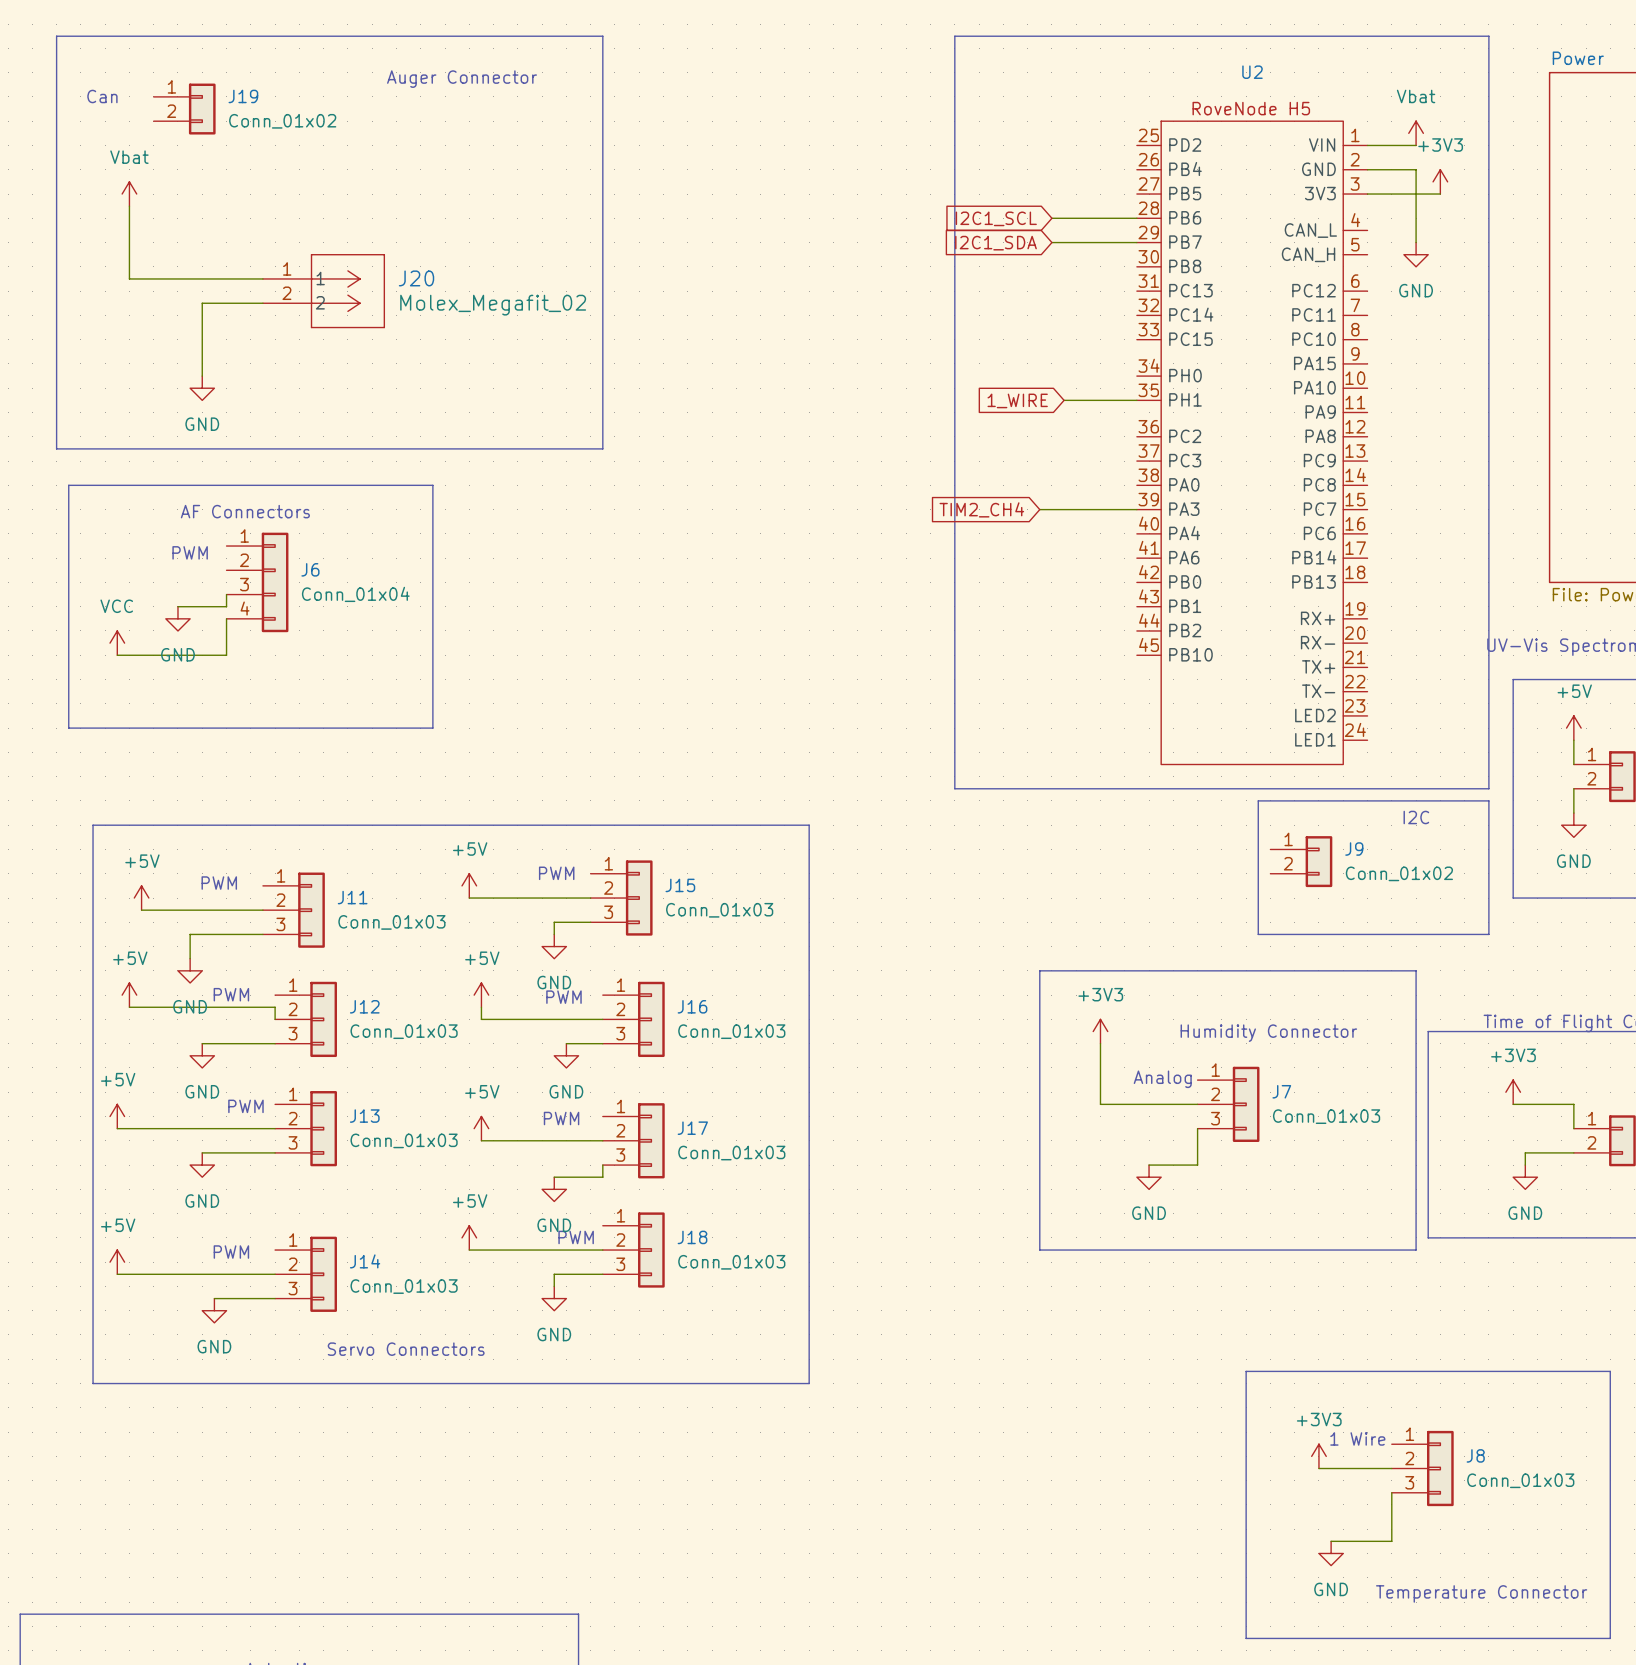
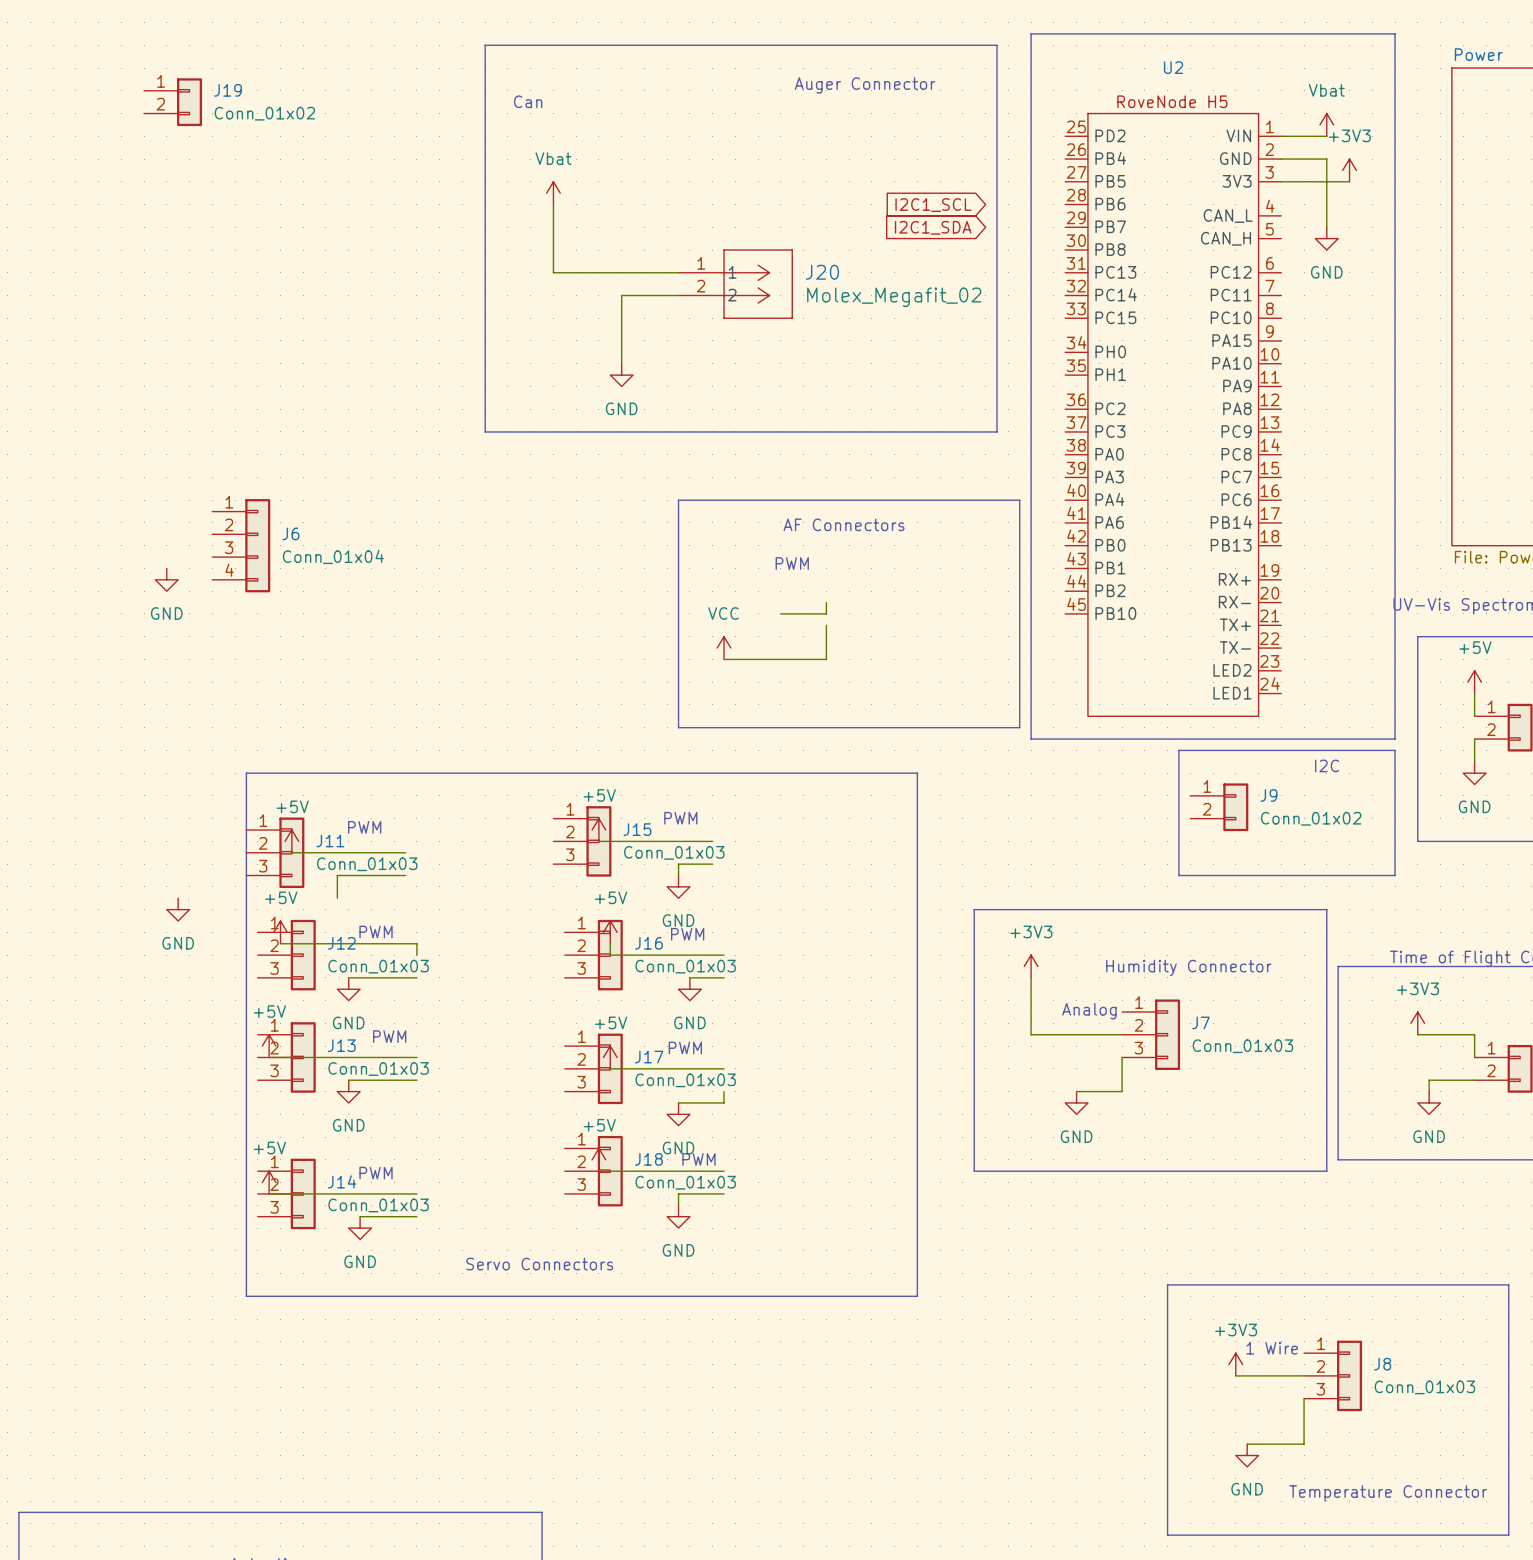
line: (56, 36) (602, 36) (602, 448) (56, 448) (56, 36) -> none
line: (1100, 36) (954, 36) (954, 788) (1100, 788) -> (1031, 33) (1031, 739)
line: none -> (485, 45) (996, 45) (996, 431) (485, 431) (485, 45)
text: Auger Connector (462, 79) -> none
text: none -> Auger Connector (865, 85)
text: Can (102, 96) -> none
text: none -> Can (528, 101)
power symbol: Vbat (129, 194) -> none
wire: (129, 206) (129, 278) (262, 278) -> none
power symbol: none -> Vbat (553, 193)
wire: none -> (553, 204) (553, 272) (678, 272)
wire: (1051, 218) (1136, 218) -> none
wire: (1051, 242) (1136, 242) -> none
J20 position: (323, 291) -> (735, 284)
wire: (262, 303) (202, 303) (202, 376) -> none
wire: none -> (678, 295) (621, 295) (621, 363)
power symbol: GND (202, 388) -> none
power symbol: none -> GND (621, 375)
global label: 1_WIRE (1017, 400) -> none
wire: (1064, 400) (1136, 400) -> none
line: (68, 485) (432, 485) (432, 728) (68, 728) (68, 485) -> none
global label: TIM2_CH4 (981, 509) -> none
wire: (1039, 509) (1136, 509) -> none
text: AF Connectors (245, 511) -> none
line: none -> (678, 500) (1019, 500) (1019, 727) (678, 727) (678, 500)
text: PWM (190, 552) -> none
text: none -> AF Connectors (844, 524)
wire: (226, 594) (226, 606) (177, 606) -> none
text: none -> PWM (792, 563)
wire: (226, 618) (226, 655) (117, 655) -> none
power symbol: VCC (117, 643) -> none
wire: none -> (826, 602) (826, 613) (780, 613)
wire: none -> (826, 625) (826, 659) (724, 659)
power symbol: none -> VCC (724, 648)
line: (262, 825) (93, 825) (93, 1383) (262, 1383) -> (246, 773) (246, 1296)
line: (809, 825) (809, 1383) -> (758, 773) (917, 773) (917, 1296) (758, 1296)
text: PWM (556, 873) -> none
text: none -> PWM (680, 818)
text: PWM (219, 883) -> none
text: none -> PWM (364, 827)
power symbol: +5V (469, 885) -> none
power symbol: none -> +5V (598, 830)
power symbol: +5V (141, 898) -> none
power symbol: none -> +5V (291, 841)
wire: (469, 898) (590, 898) -> (598, 841) (712, 841)
wire: (141, 910) (262, 910) -> (291, 852) (405, 852)
wire: (590, 922) (554, 922) (554, 934) -> (712, 864) (678, 864) (678, 875)
wire: (262, 934) (190, 934) (190, 958) -> (405, 875) (337, 875) (337, 898)
power symbol: GND (554, 946) -> none
power symbol: none -> GND (678, 886)
text: PWM (231, 994) -> none
text: none -> PWM (376, 931)
power symbol: +5V (129, 995) -> none
power symbol: none -> +5V (280, 932)
power symbol: +5V (481, 995) -> none
power symbol: none -> +5V (610, 932)
text: PWM (563, 997) -> none
text: none -> PWM (687, 934)
wire: (129, 1007) (275, 1007) (275, 1019) -> (280, 943) (416, 943) (416, 955)
wire: (481, 1007) (481, 1019) (602, 1019) -> (610, 943) (610, 955) (724, 955)
wire: (202, 1043) (275, 1043) -> (348, 977) (416, 977)
wire: (566, 1043) (602, 1043) -> (689, 977) (724, 977)
power symbol: GND (202, 1055) -> none
power symbol: none -> GND (348, 989)
power symbol: GND (566, 1055) -> none
power symbol: none -> GND (689, 989)
text: PWM (245, 1106) -> none
text: none -> PWM (389, 1036)
power symbol: +5V (117, 1116) -> none
power symbol: none -> +5V (269, 1046)
text: PWM (561, 1118) -> none
text: none -> PWM (685, 1047)
wire: (117, 1128) (275, 1128) -> (269, 1057) (416, 1057)
power symbol: +5V (481, 1128) -> none
power symbol: none -> +5V (610, 1057)
wire: (481, 1140) (602, 1140) -> (610, 1068) (724, 1068)
wire: (202, 1152) (275, 1152) -> (348, 1080) (416, 1080)
power symbol: GND (202, 1165) -> none
power symbol: none -> GND (348, 1091)
wire: (602, 1165) (602, 1177) (554, 1177) -> (724, 1091) (724, 1102) (678, 1102)
power symbol: GND (554, 1189) -> none
power symbol: none -> GND (678, 1114)
power symbol: +5V (469, 1237) -> none
text: PWM (576, 1237) -> none
power symbol: none -> +5V (598, 1159)
text: none -> PWM (699, 1159)
wire: (469, 1250) (602, 1250) -> (598, 1171) (724, 1171)
text: PWM (231, 1252) -> none
text: none -> PWM (376, 1173)
power symbol: +5V (117, 1262) -> none
power symbol: none -> +5V (269, 1182)
wire: (117, 1274) (275, 1274) -> (269, 1193) (416, 1193)
wire: (602, 1274) (554, 1274) (554, 1286) -> (724, 1193) (678, 1193) (678, 1205)
wire: (214, 1298) (275, 1298) -> (360, 1216) (416, 1216)
power symbol: GND (554, 1298) -> none
power symbol: none -> GND (678, 1216)
power symbol: GND (214, 1310) -> none
power symbol: none -> GND (360, 1228)
text position: Servo Connectors (406, 1349) -> Servo Connectors (539, 1264)

